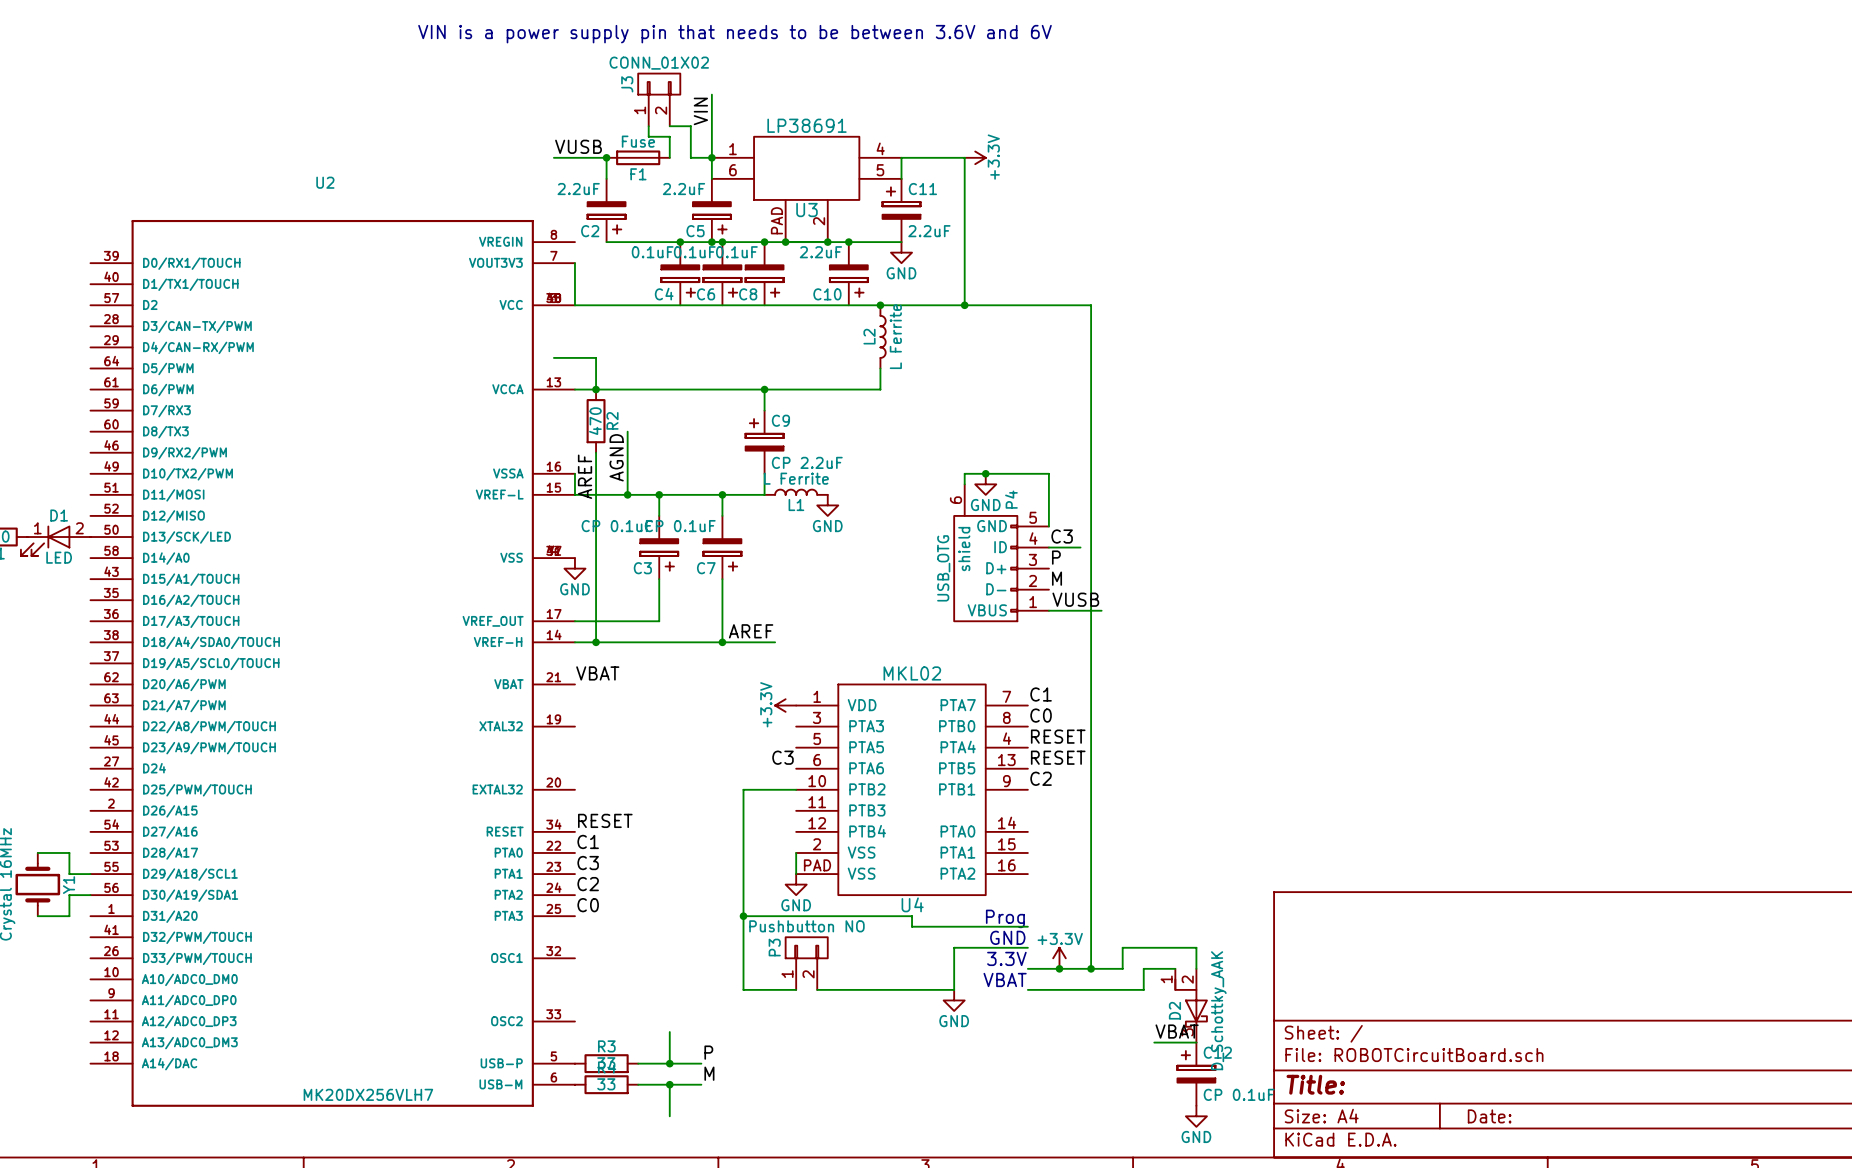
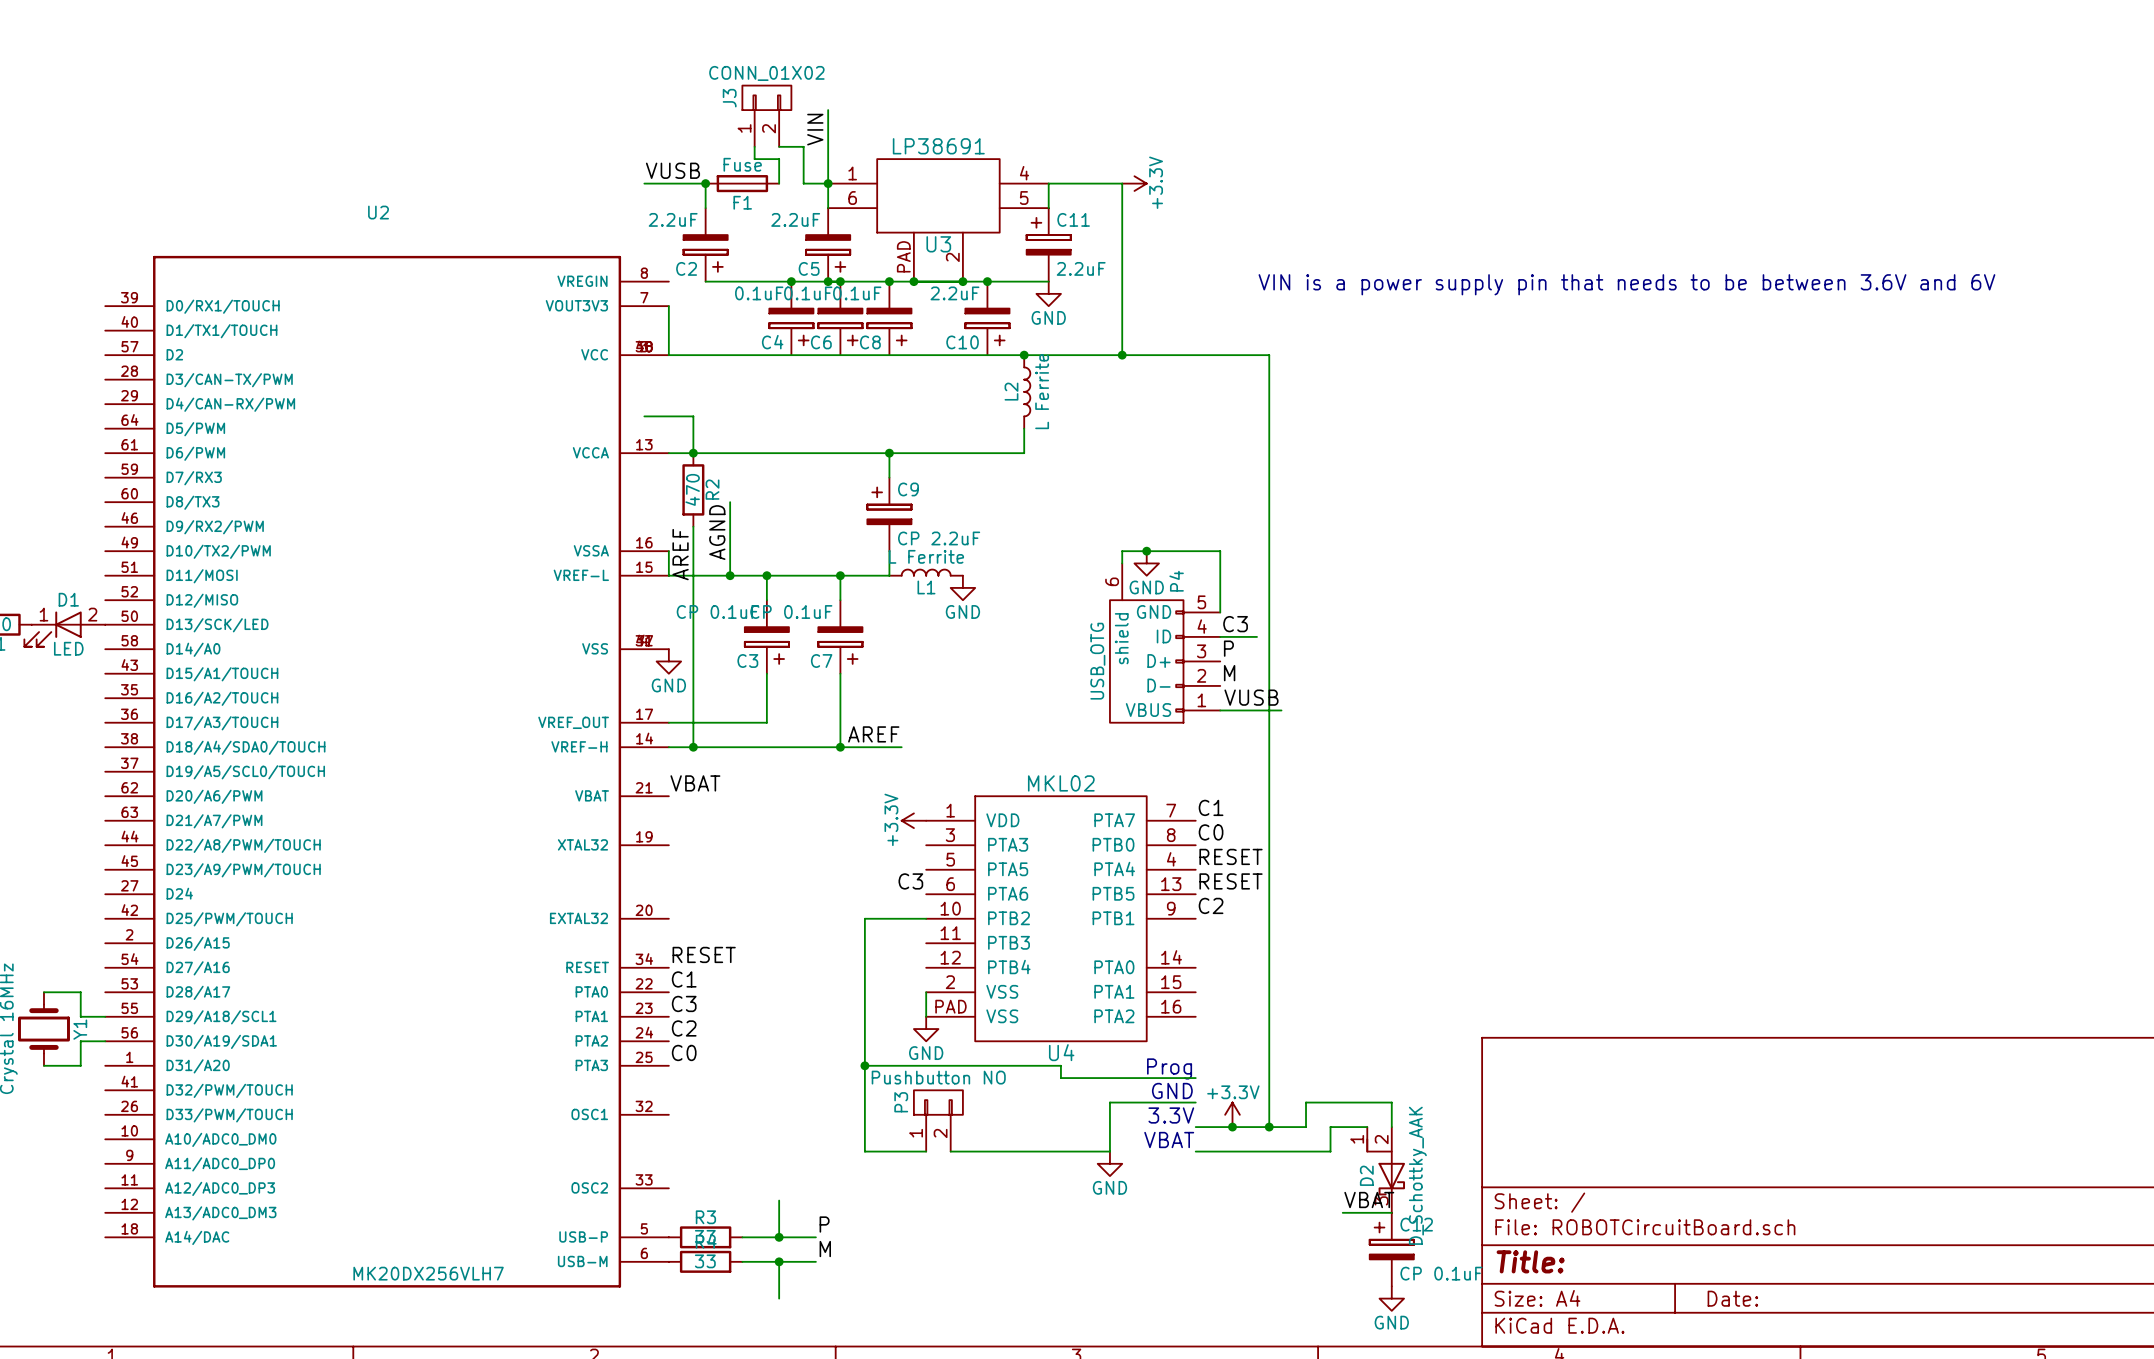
text: VIN is a power supply pin that needs to be between 3.6V and 6V (735, 34) -> none
text: none -> VIN is a power supply pin that needs to be between 3.6V and 6V (1626, 284)

